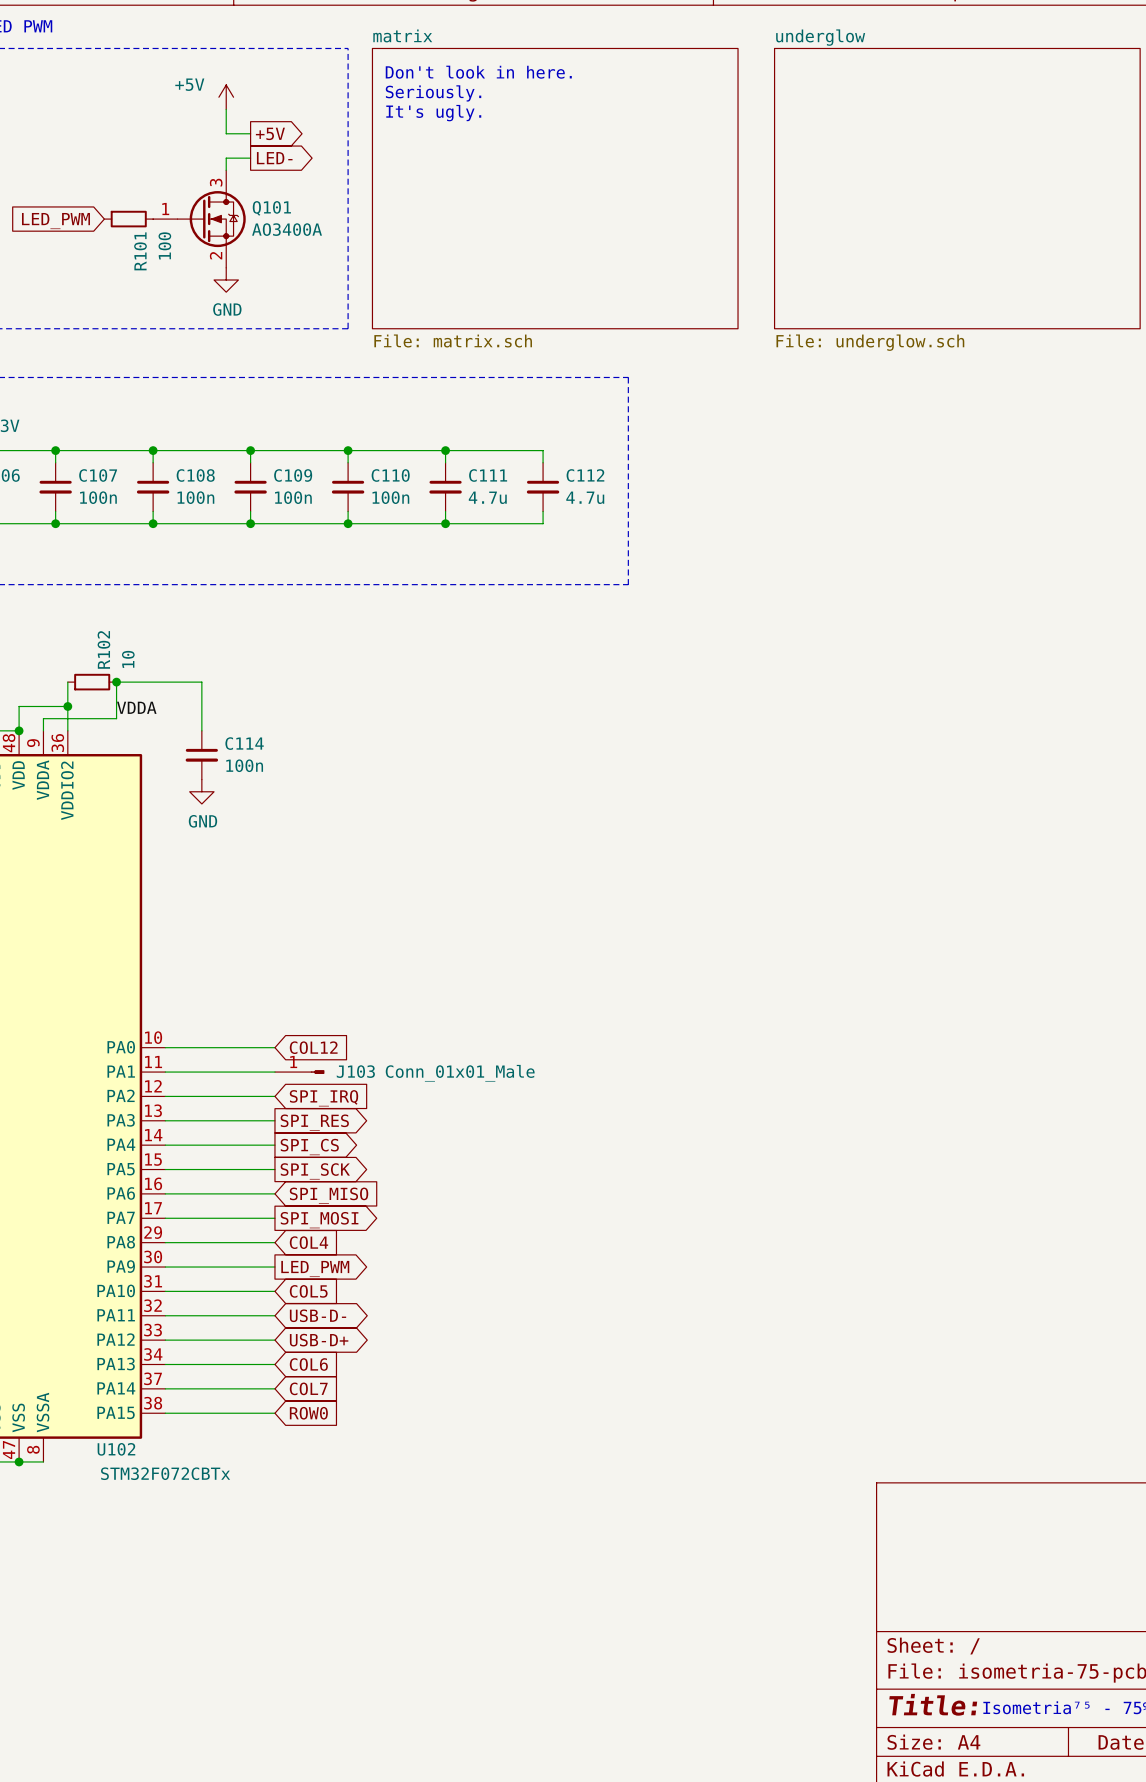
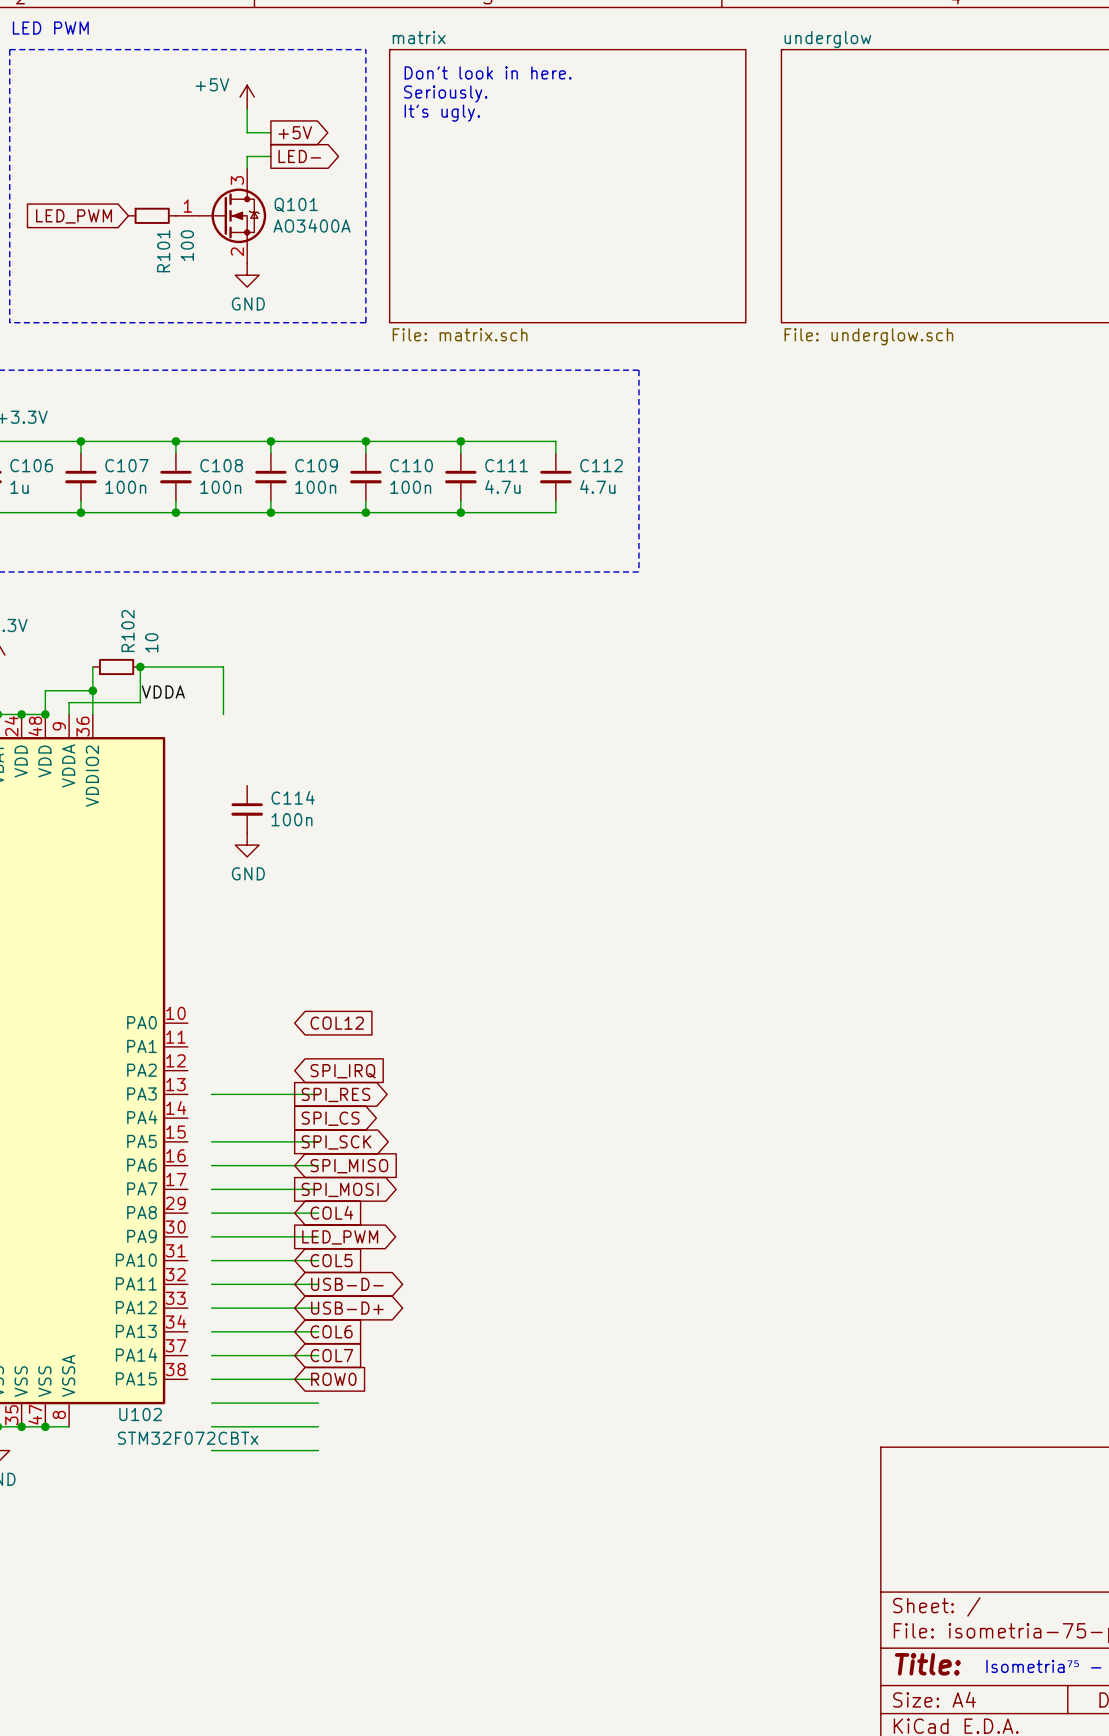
C114 position: (201, 755) -> (247, 809)
power symbol position: GND (201, 791) -> GND (247, 845)
wire: (165, 1047) (274, 1047) -> none
wire: (165, 1072) (274, 1072) -> none
J103: Conn_01x01_Male (299, 1072) -> none
wire: (165, 1096) (274, 1096) -> none
wire: (165, 1120) (189, 1120) -> (294, 1094) (318, 1094)
wire: (165, 1145) (274, 1145) -> none
wire: (165, 1169) (189, 1169) -> (294, 1141) (318, 1141)
wire: (165, 1193) (189, 1193) -> (294, 1165) (318, 1165)
wire: (165, 1218) (189, 1218) -> (294, 1189) (318, 1189)
wire: (165, 1242) (189, 1242) -> (294, 1213) (318, 1213)
wire: (165, 1267) (189, 1267) -> (294, 1236) (318, 1236)
wire: (165, 1291) (189, 1291) -> (294, 1260) (318, 1260)
wire: (165, 1315) (189, 1315) -> (294, 1284) (318, 1284)
wire: (165, 1340) (189, 1340) -> (294, 1308) (318, 1308)
wire: (165, 1364) (189, 1364) -> (294, 1331) (318, 1331)
wire: (165, 1388) (189, 1388) -> (294, 1355) (318, 1355)
wire: (165, 1413) (189, 1413) -> (294, 1379) (318, 1379)
wire: none -> (211, 1403) (318, 1403)
wire: none -> (211, 1426) (318, 1426)
wire: none -> (211, 1450) (318, 1450)

